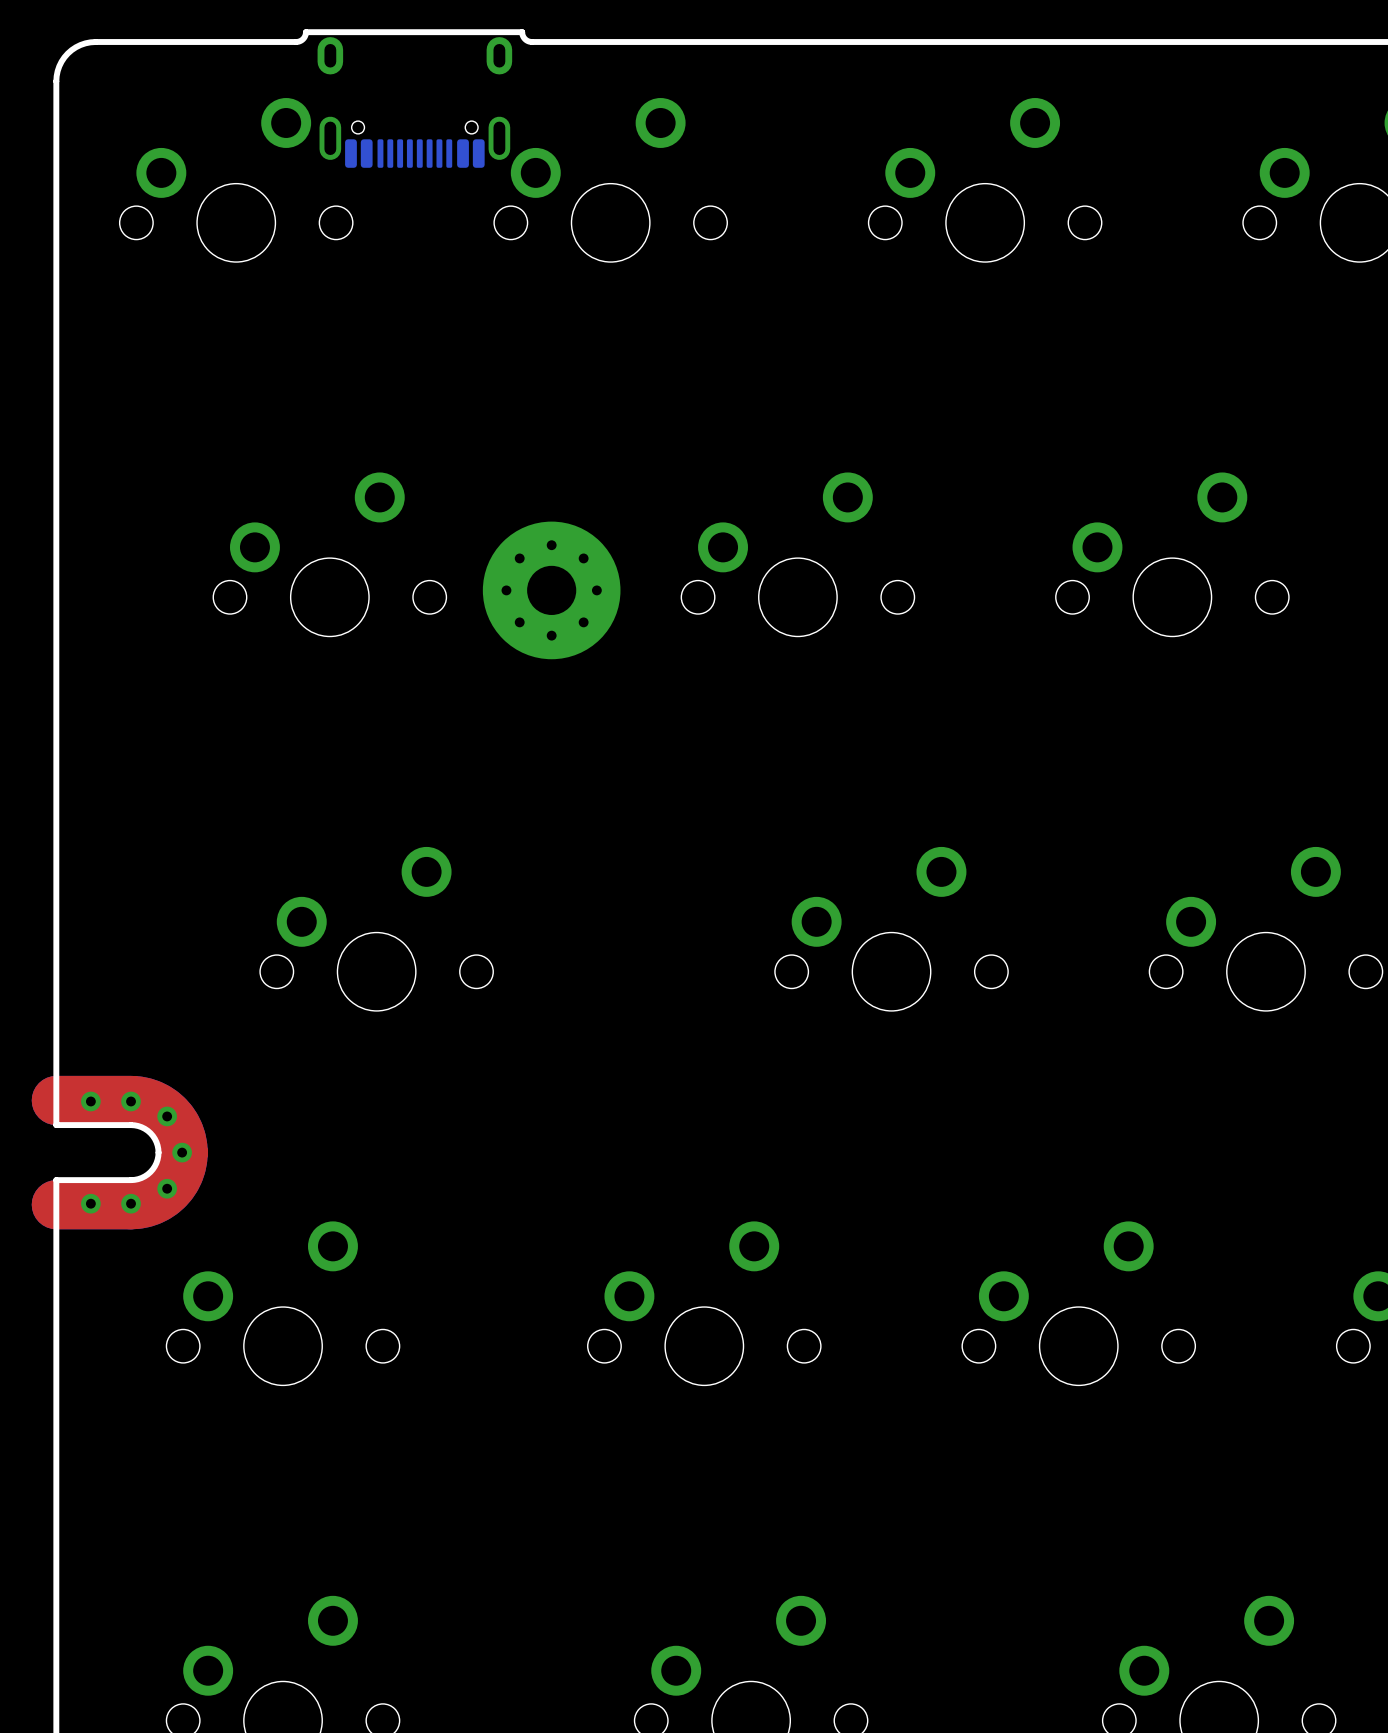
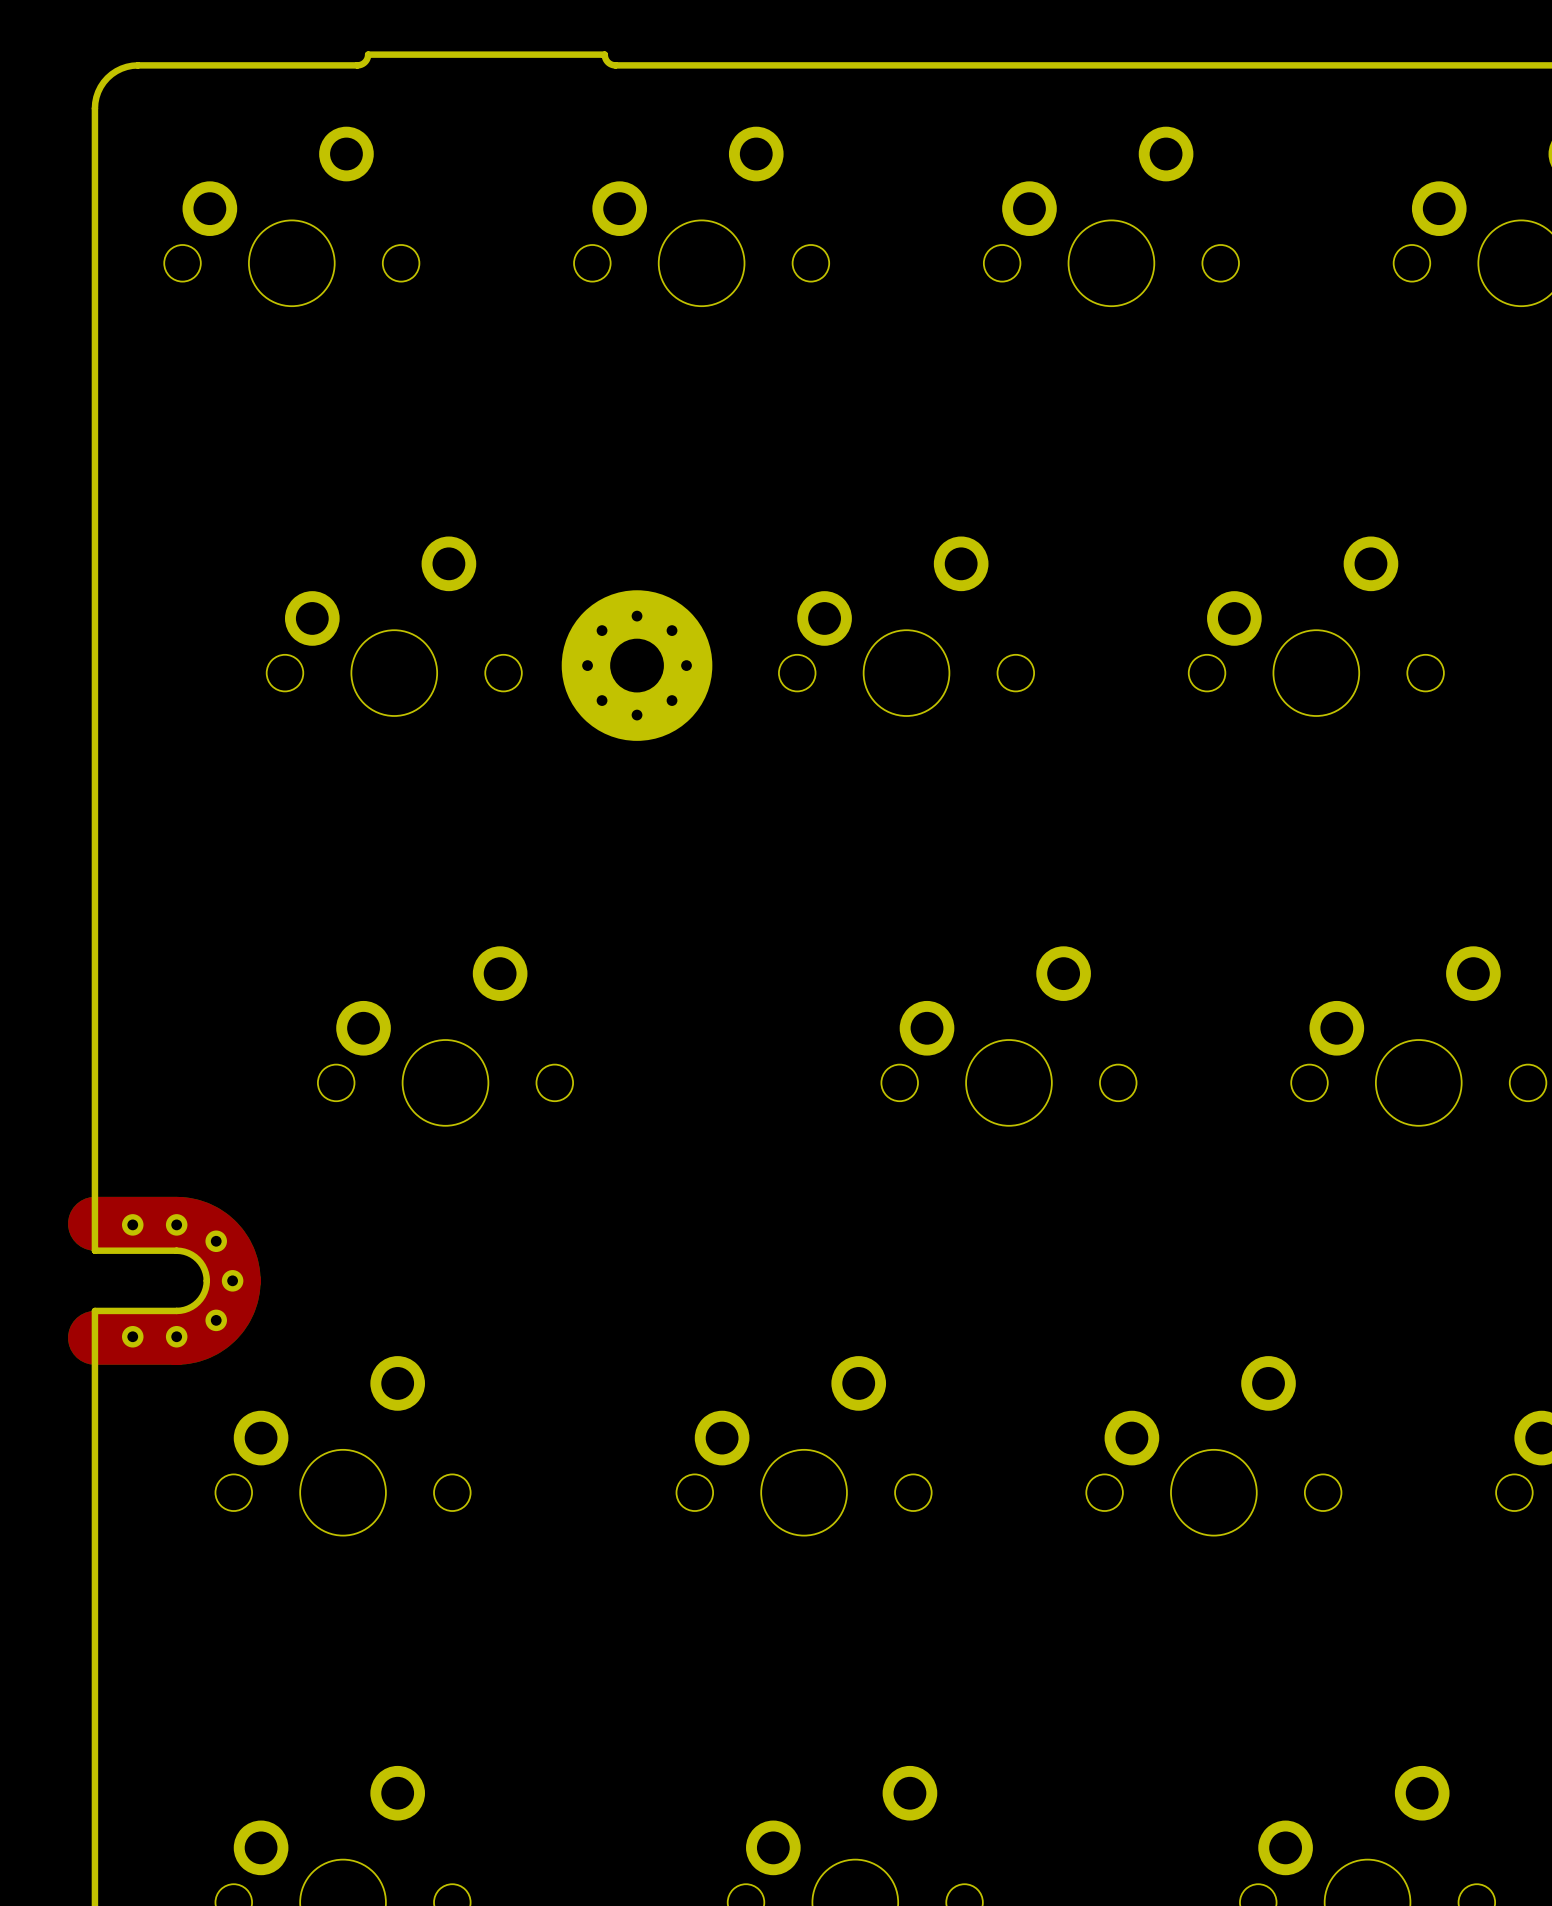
part: (414, 102) -> none

